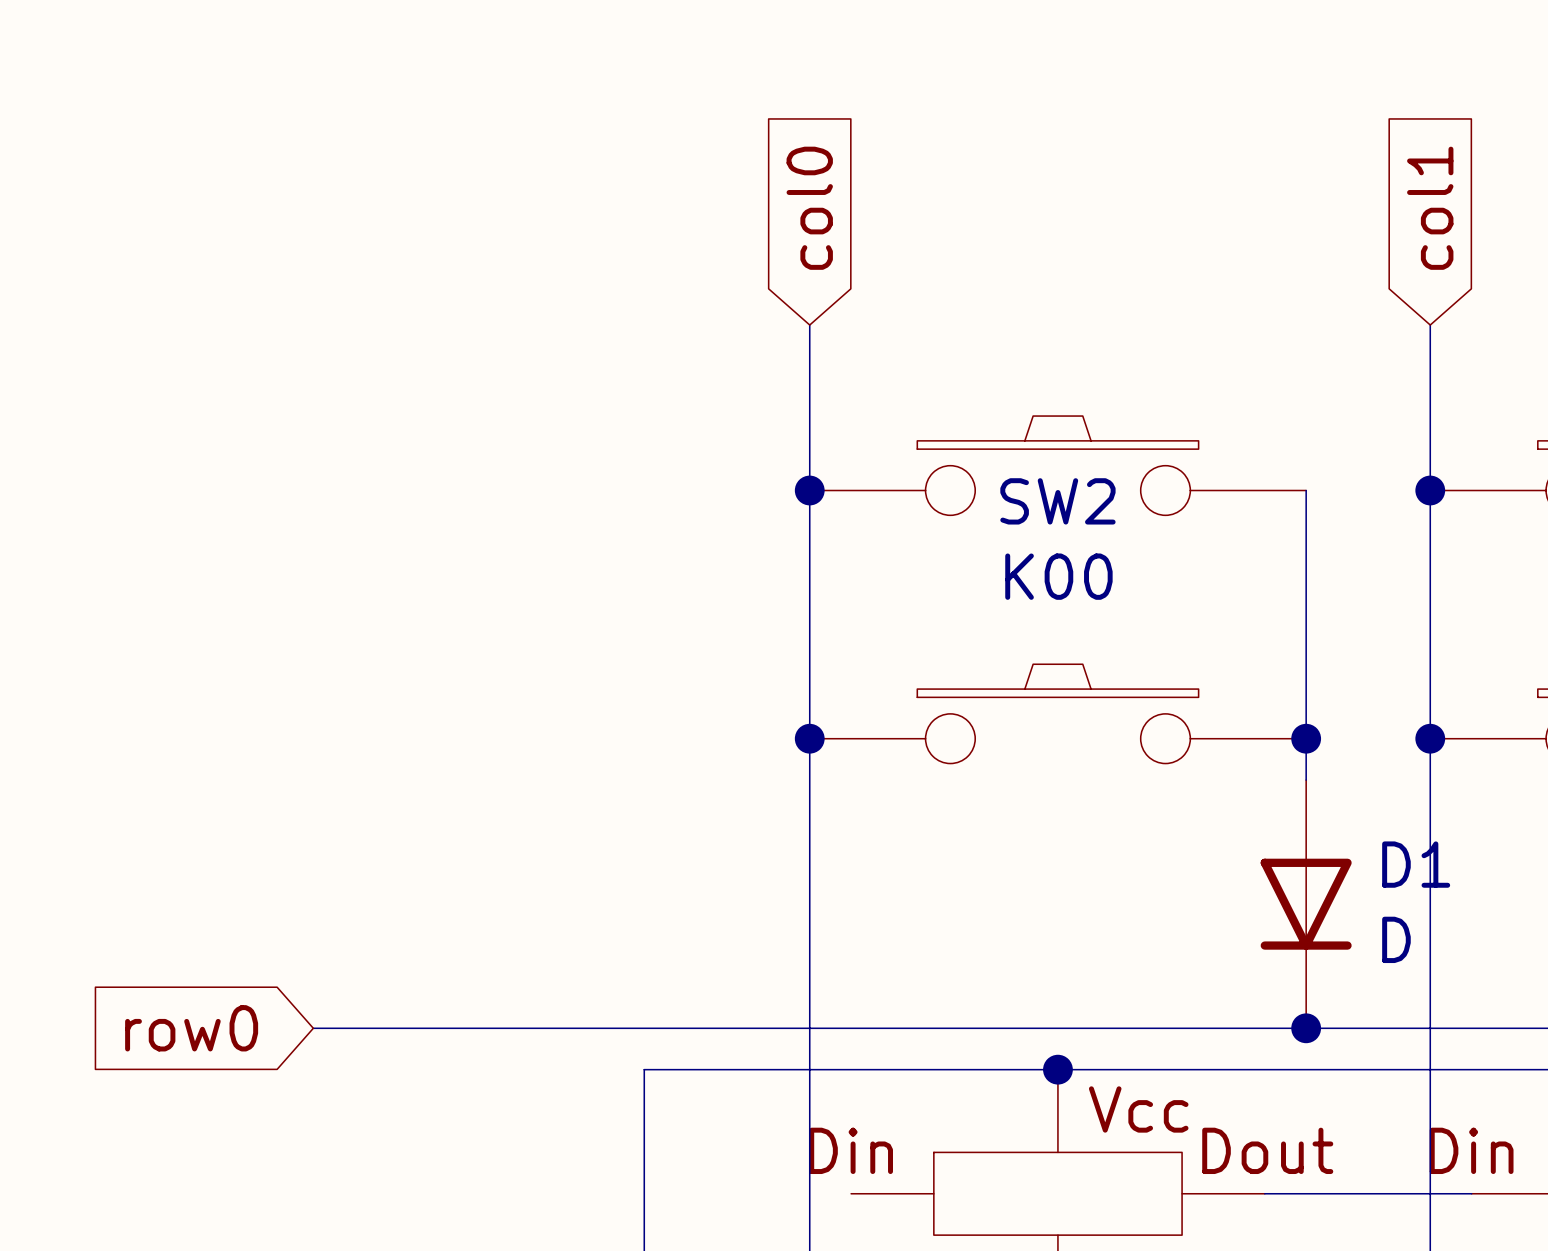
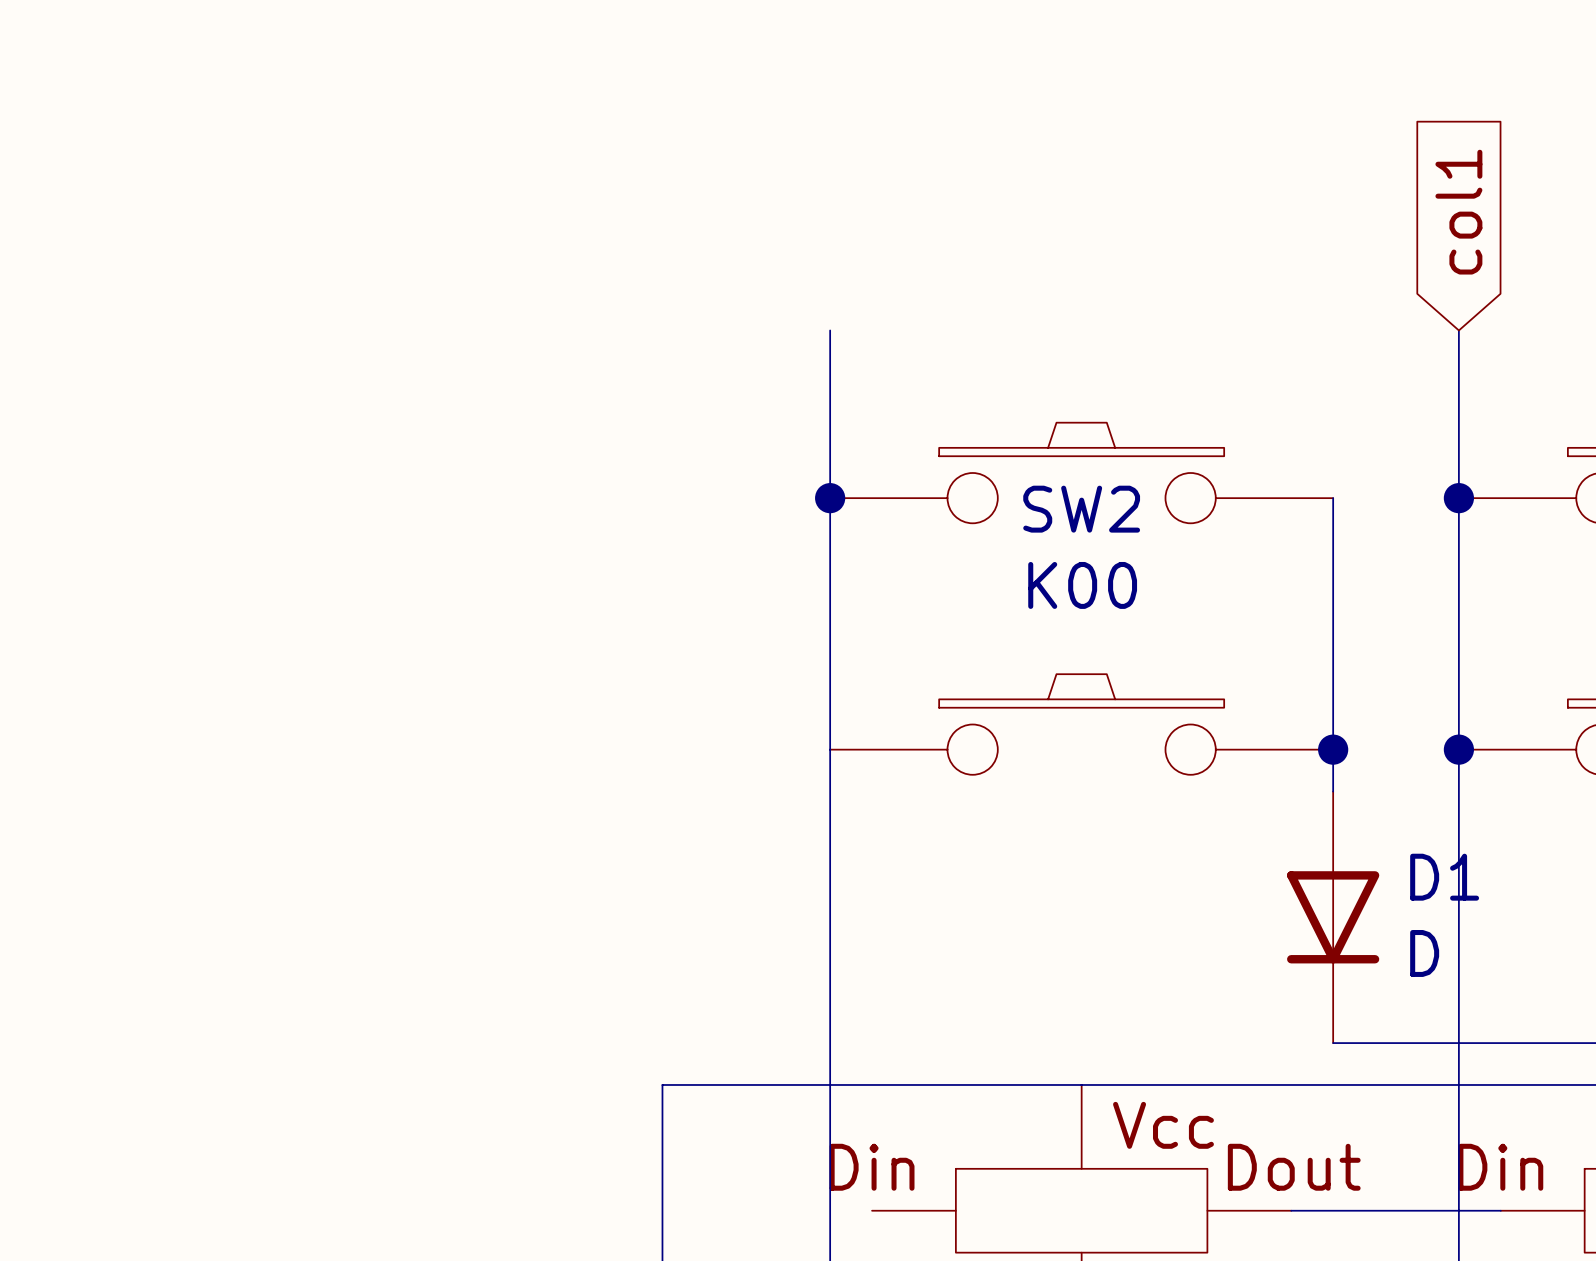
global label: col0 (809, 208) -> none
junction: (809, 738) -> none
global label: row0 (191, 1028) -> none
wire: (313, 1028) (1306, 1028) -> none
junction: (1306, 1028) -> none
junction: (1057, 1069) -> none

